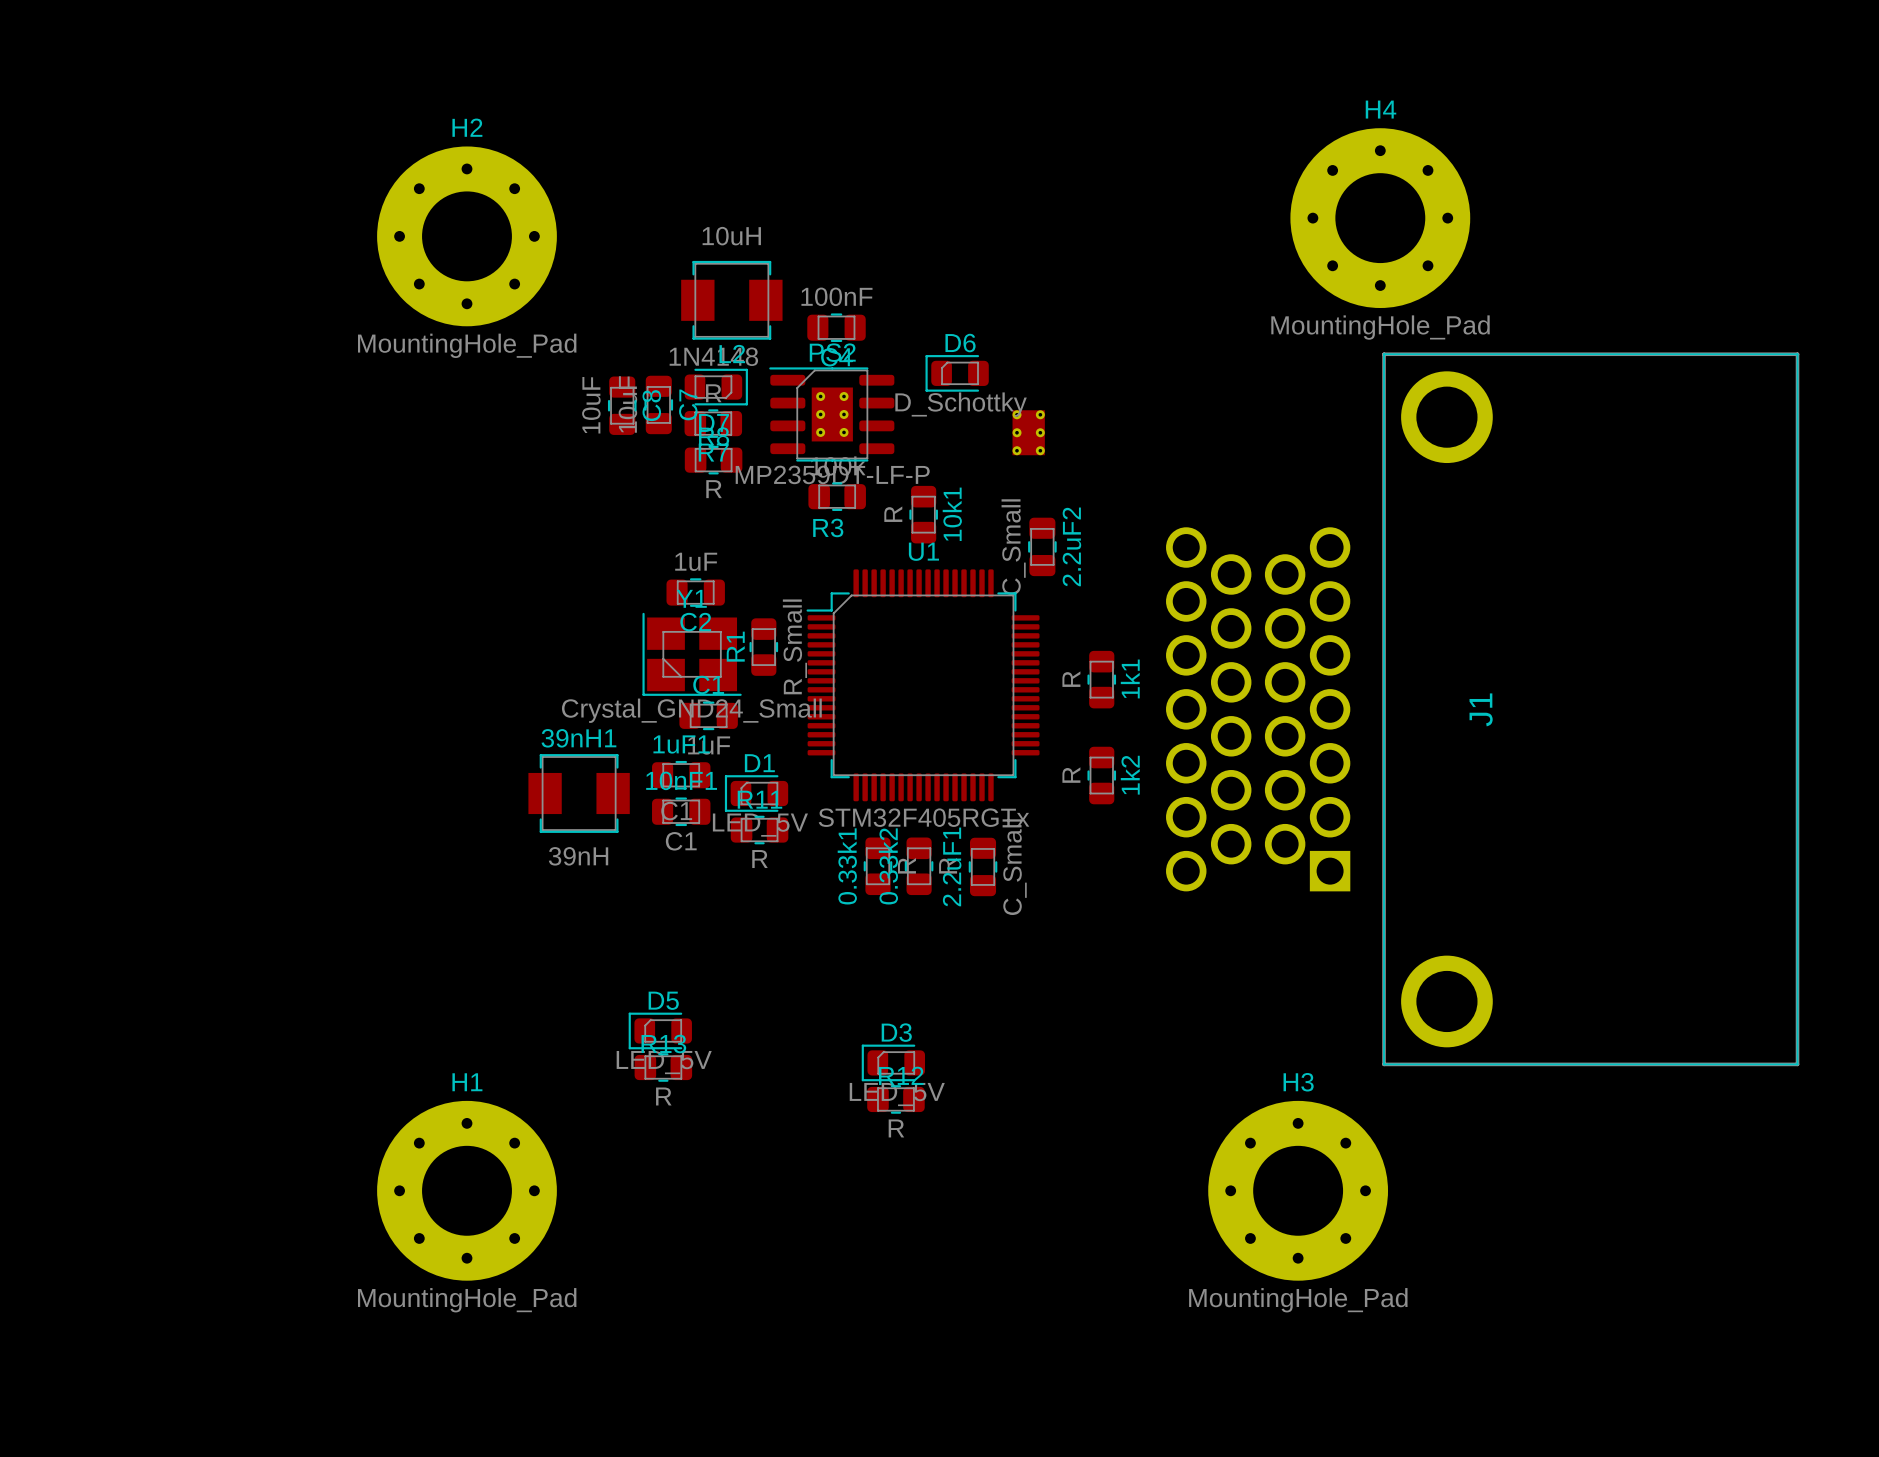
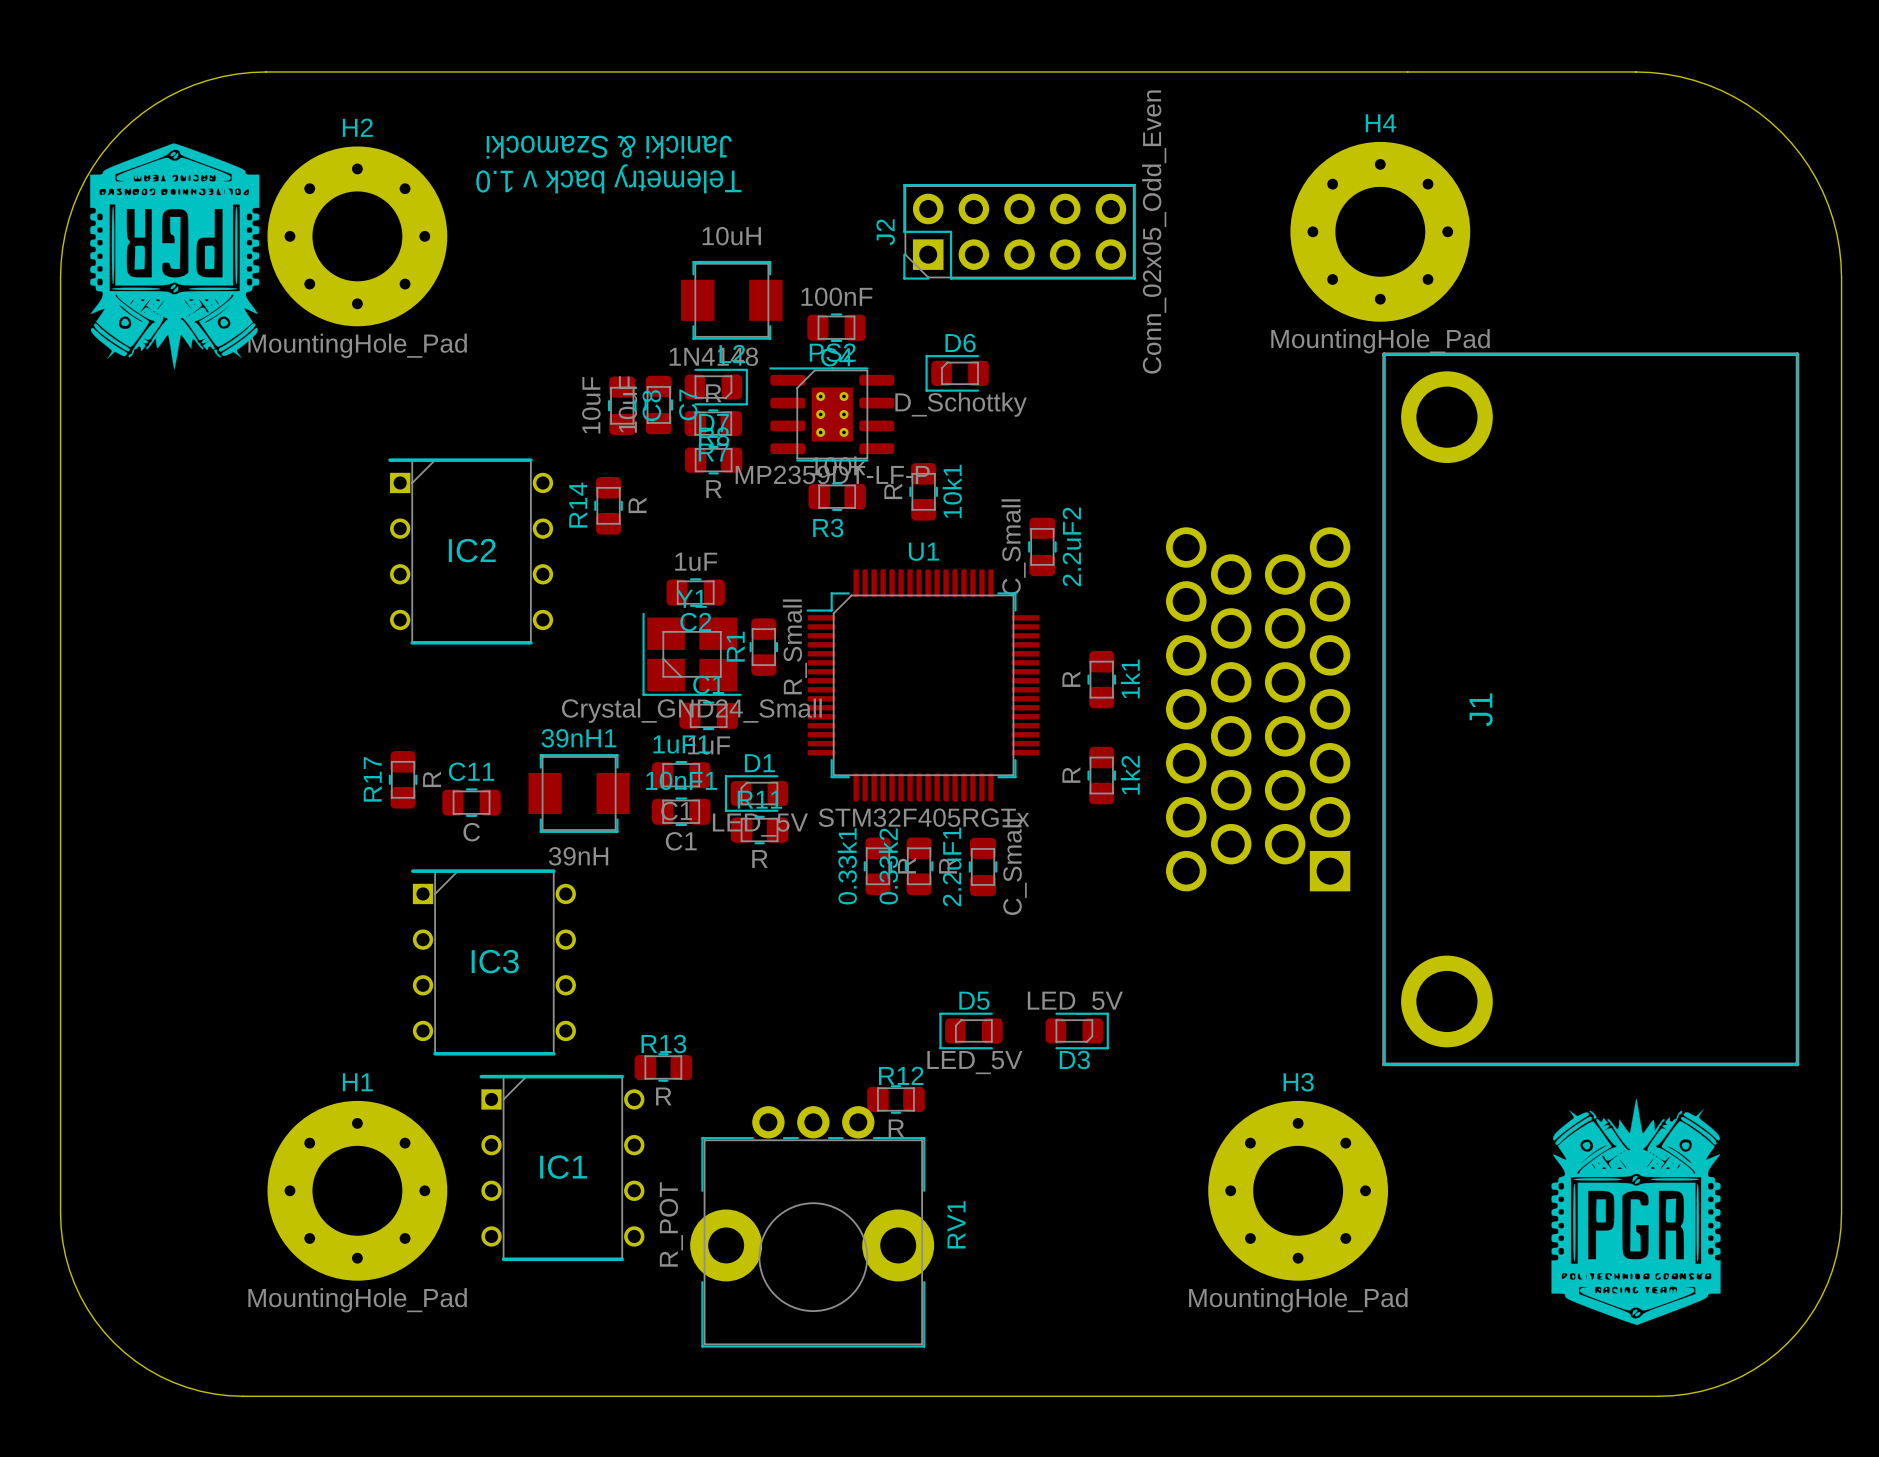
board edge: none -> (266, 71) (1636, 71) (1665, 74) (1707, 84) (1747, 104) (1770, 122) (1800, 154) (1822, 192) (1836, 233) (1841, 277) (1840, 1227) (1836, 1256) (1827, 1283) (1814, 1309) (1797, 1332) (1777, 1352) (1741, 1376) (1701, 1391) (1658, 1396) (243, 1396) (214, 1394) (186, 1387) (147, 1369) (124, 1352) (95, 1321) (80, 1296) (69, 1270) (61, 1227) (60, 277) (62, 248) (73, 205) (85, 178) (101, 154) (131, 122) (154, 104) (194, 84) (236, 74) (266, 71)
drawing: none -> [90, 143, 260, 370]
text: none -> Janicki & Szamocki (609, 147)
text: none -> Telemetry back v 1.0 (608, 178)
H4 position: (1380, 218) -> (1380, 231)
J2: none -> Conn_02x05_Odd_Even (1019, 231)
H2 position: (466, 236) -> (357, 236)
part: (1028, 432) -> none
R14: none -> R (608, 505)
10k1 position: (923, 514) -> (923, 491)
IC2: none -> (470, 551)
R17: none -> R (403, 779)
C11: none -> C (471, 802)
IC3: none -> (493, 962)
D5 position: (660, 1030) -> (971, 1030)
D3 rotation: 0° (893, 1062) -> 180° (1077, 1030)
D3 position: (893, 1062) -> (1077, 1030)
drawing: none -> [1551, 1098, 1721, 1325]
IC1: none -> (561, 1167)
H1 position: (466, 1190) -> (357, 1190)
RV1: none -> R_POT (812, 1226)

